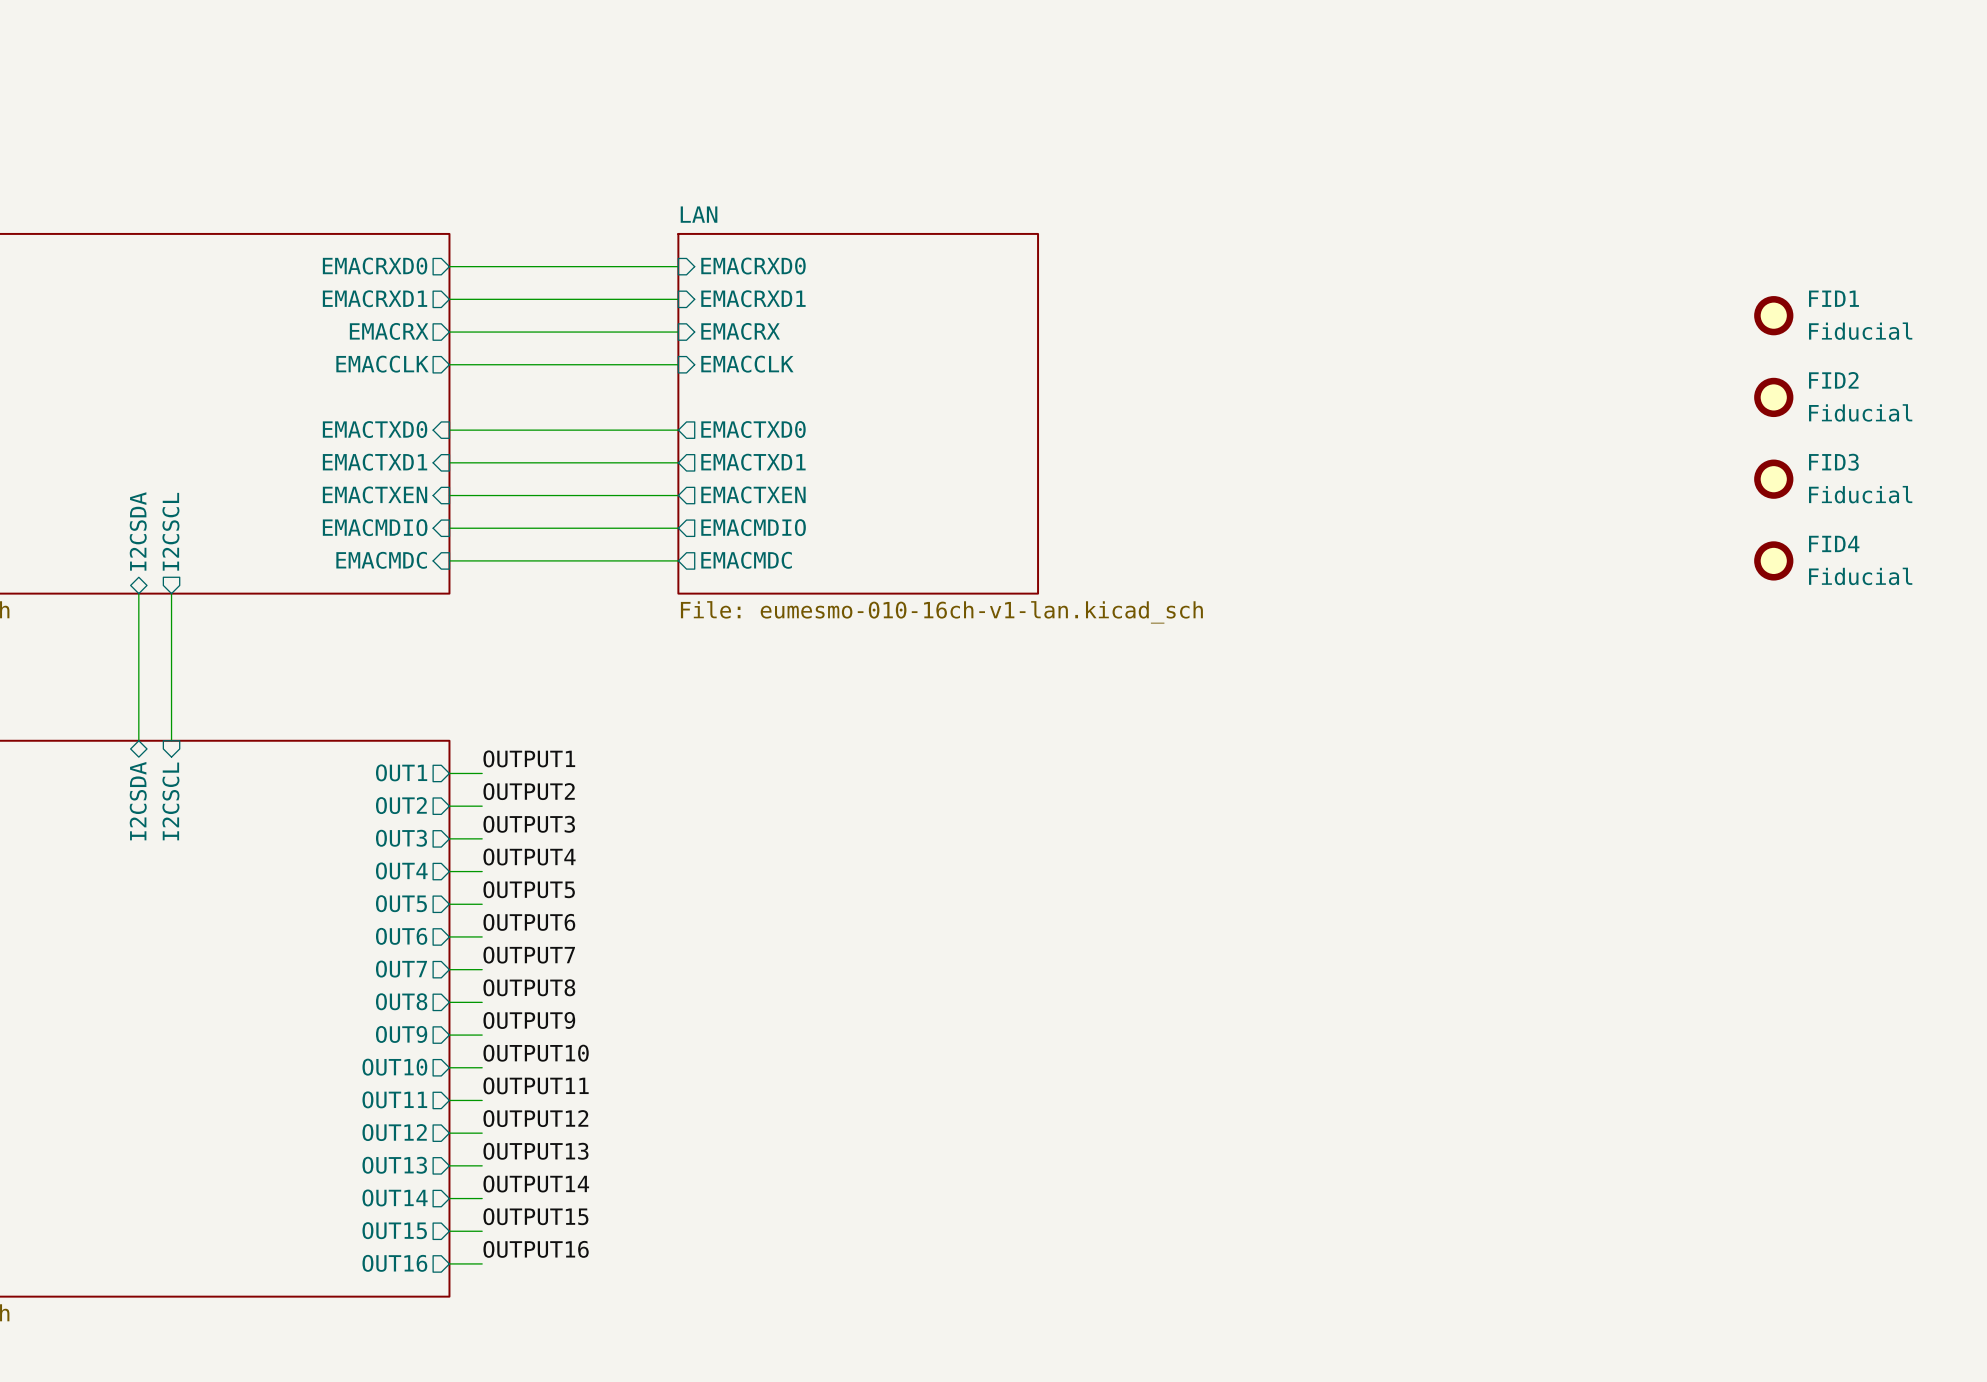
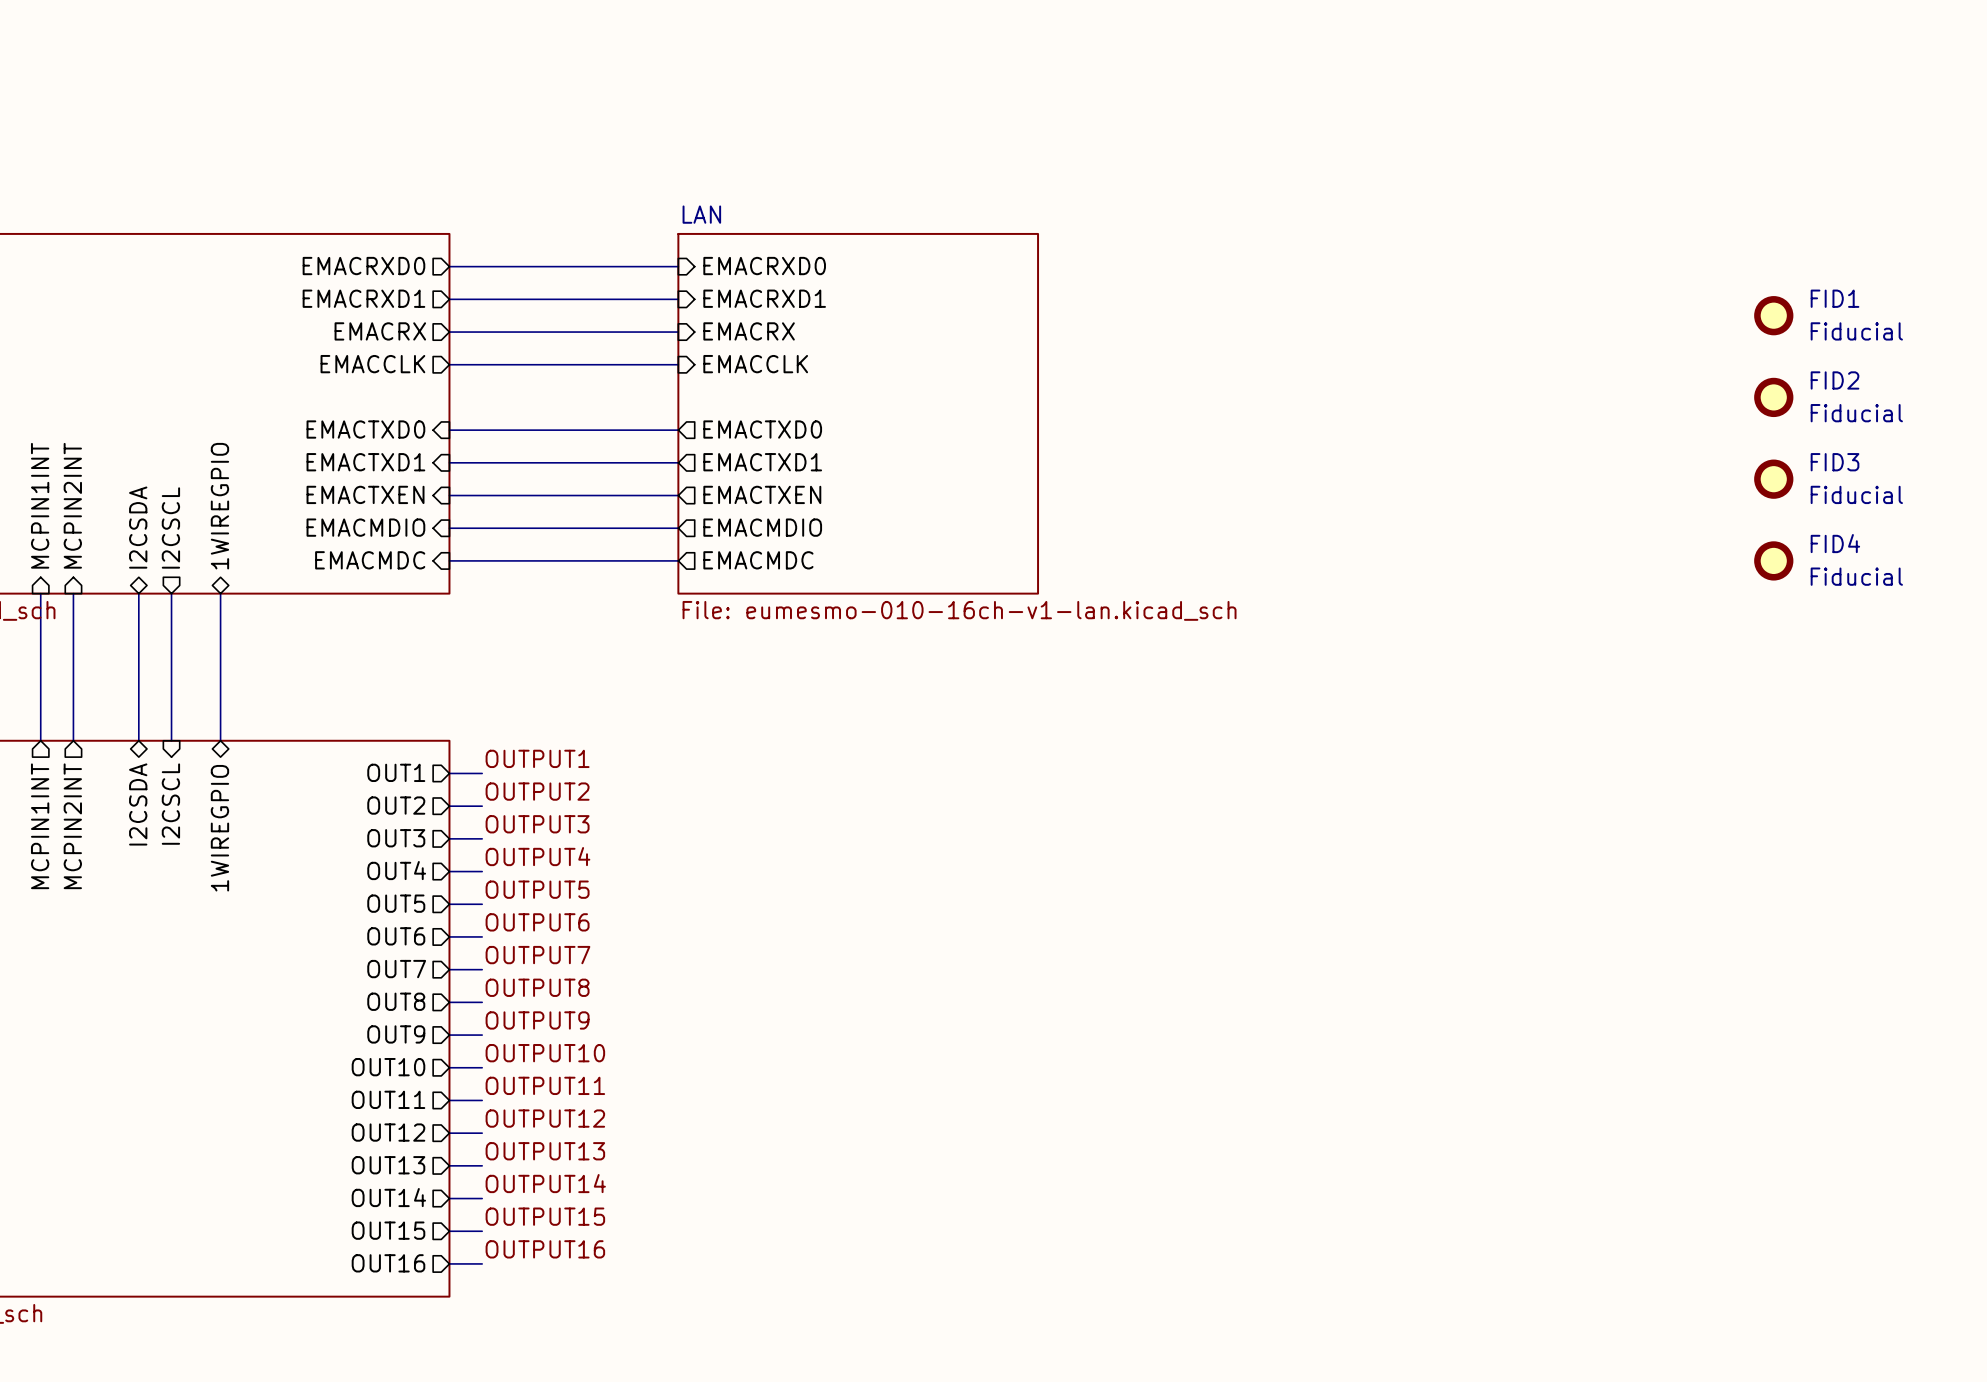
sheet pin: none -> MCPIN1INT (40, 505)
sheet pin: none -> MCPIN2INT (72, 505)
sheet pin: none -> 1WIREGPIO (219, 506)
wire: none -> (40, 593) (40, 740)
wire: none -> (73, 593) (73, 740)
wire: none -> (220, 593) (220, 740)
sheet pin: none -> 1WIREGPIO (219, 828)
sheet pin: none -> MCPIN1INT (40, 826)
sheet pin: none -> MCPIN2INT (72, 826)

